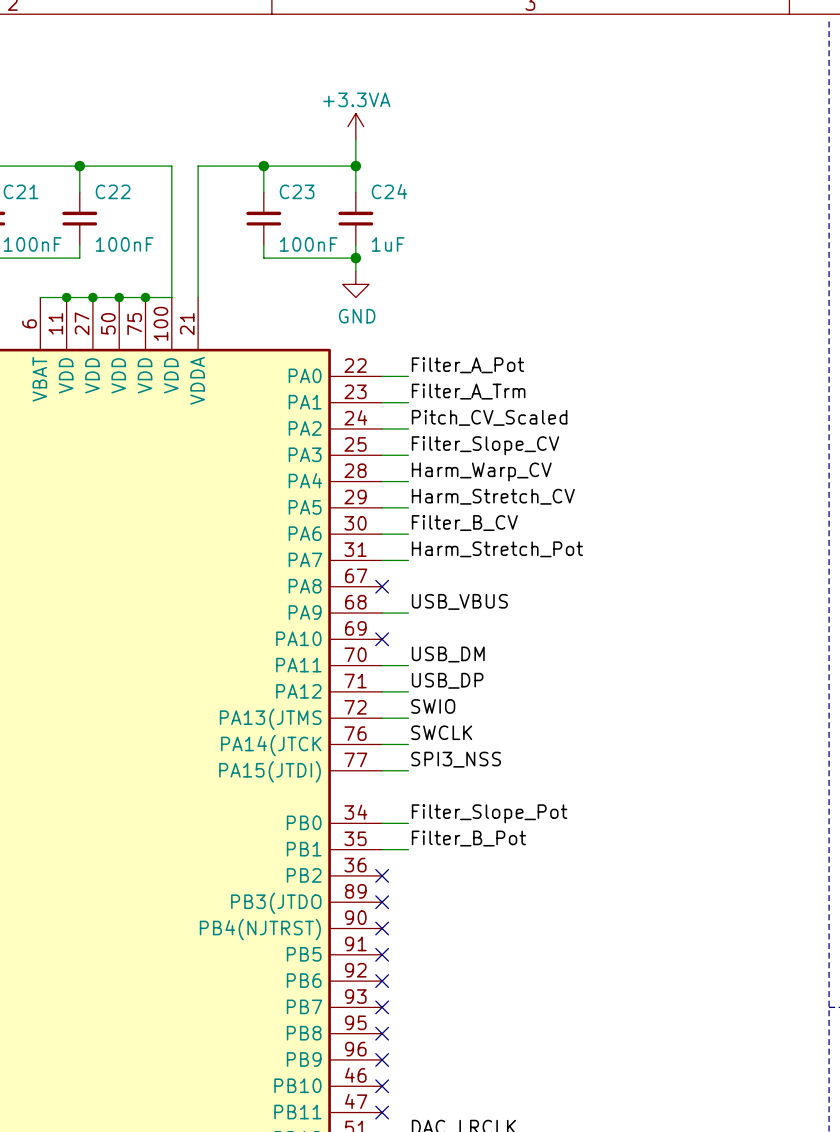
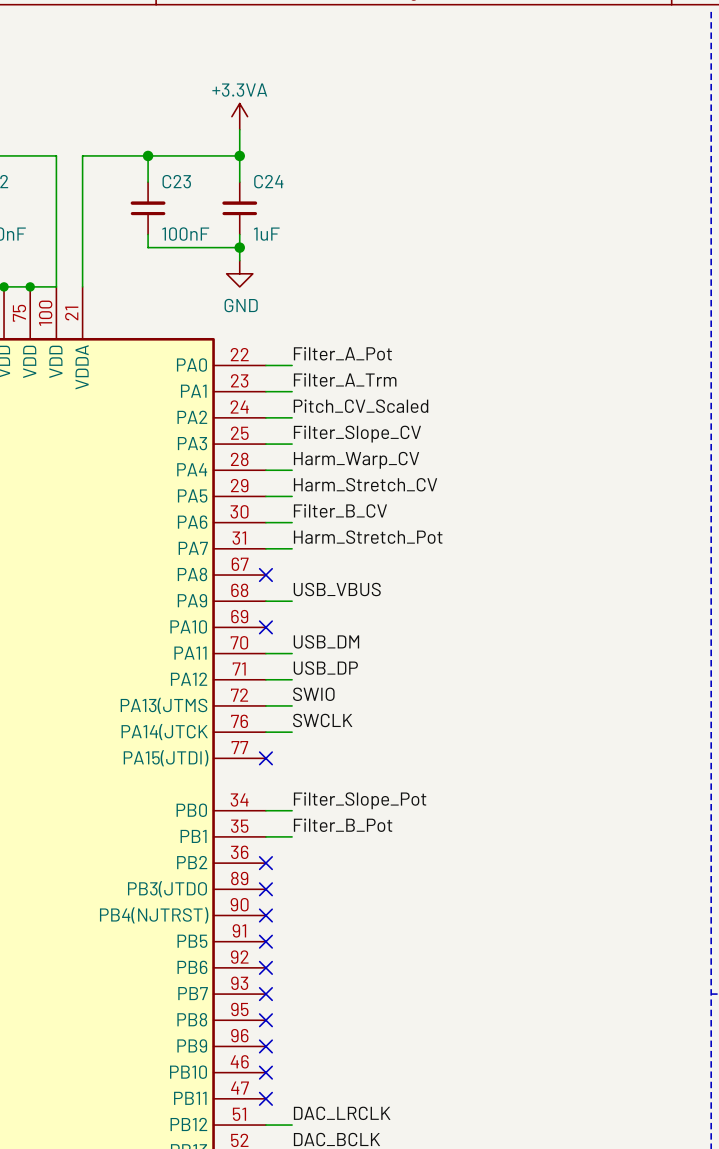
label: SPI3_NSS (456, 759) -> none
wire: (382, 770) (408, 770) -> none
no-connect mark: none -> (265, 758)

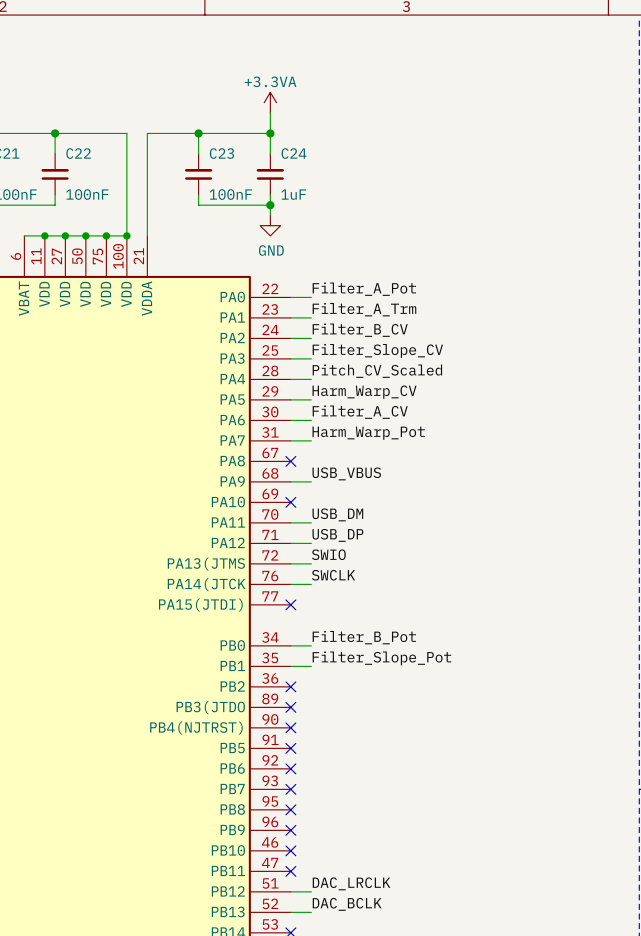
junction: none -> (126, 235)
label: Pitch_CV_Scaled (361, 406) -> Filter_B_CV (360, 330)
label: Harm_Warp_CV (356, 460) -> Pitch_CV_Scaled (377, 371)
label: Harm_Stretch_CV (365, 484) -> Harm_Warp_CV (364, 392)
label: Filter_B_CV (340, 510) -> Filter_A_CV (360, 412)
label: Harm_Stretch_Pot (368, 537) -> Harm_Warp_Pot (368, 433)
label: Filter_Slope_Pot (360, 800) -> Filter_B_Pot (364, 637)
label: Filter_B_Pot (343, 825) -> Filter_Slope_Pot (381, 658)

